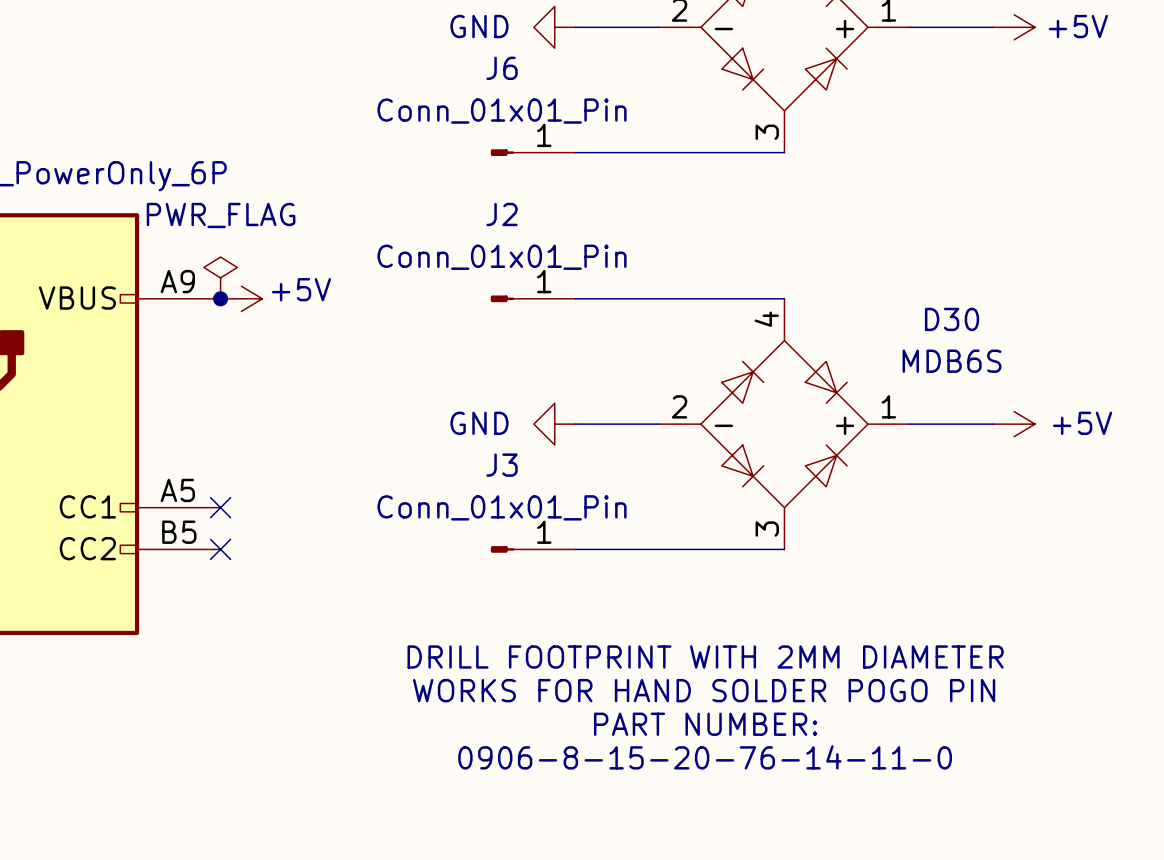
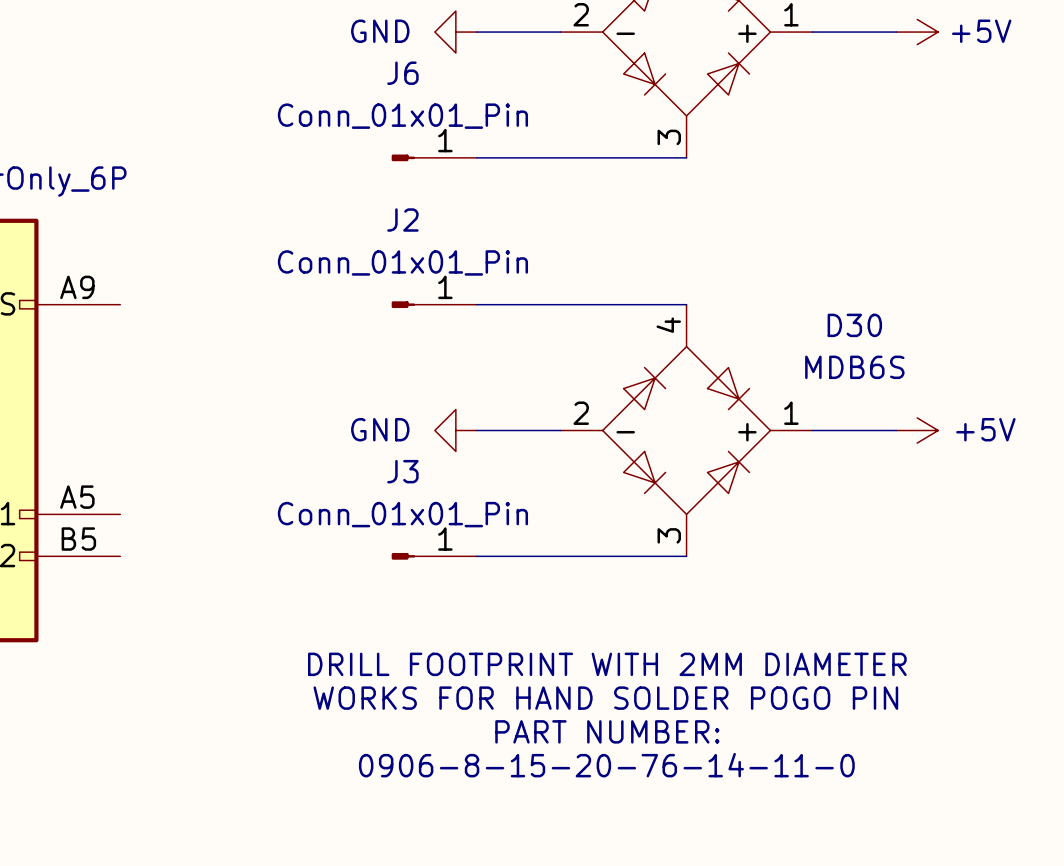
power symbol: PWR_FLAG (220, 277) -> none
junction: (220, 298) -> none
power symbol: +5V (241, 298) -> none
no-connect mark: (220, 507) -> none
no-connect mark: (220, 549) -> none

